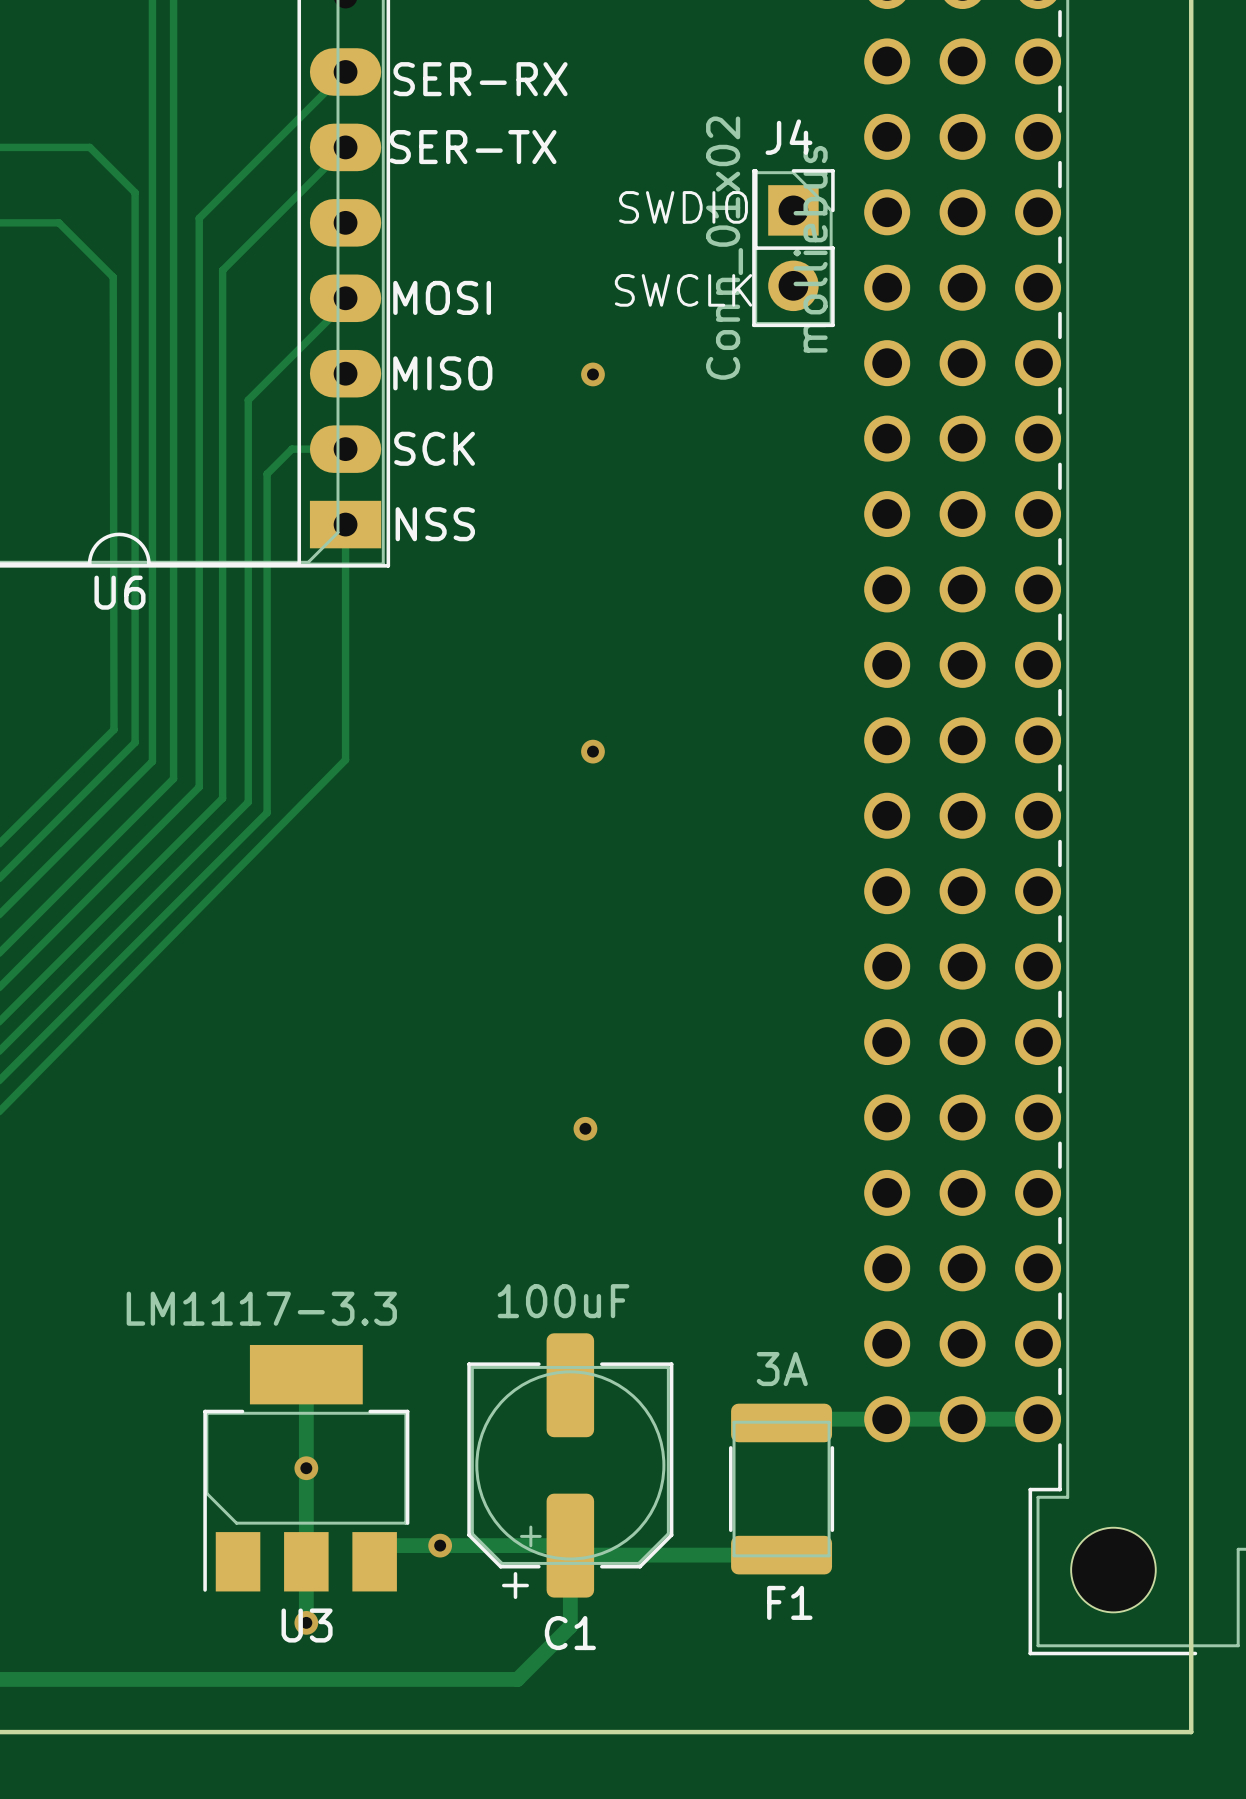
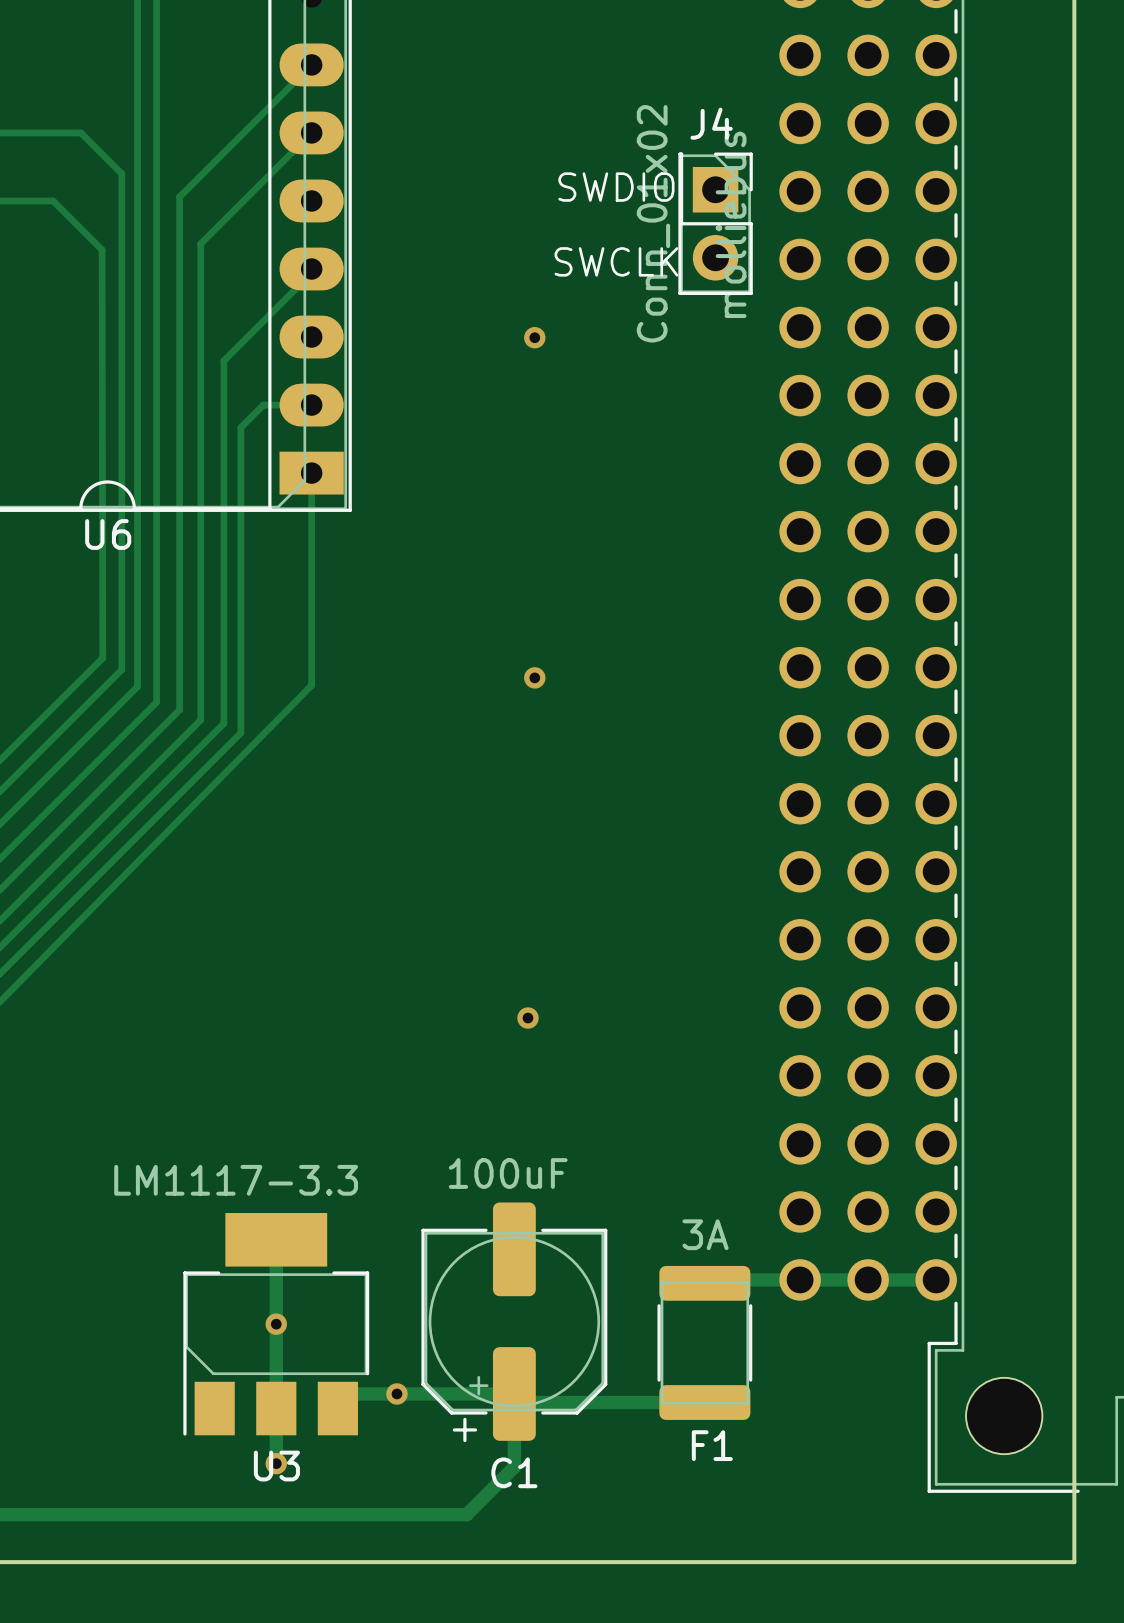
text: SER-RX (480, 79) -> none
text: SER-TX (472, 147) -> none
text: MOSI (442, 297) -> none
text: MISO (442, 373) -> none
text: SCK (434, 448) -> none
text: NSS (435, 524) -> none

